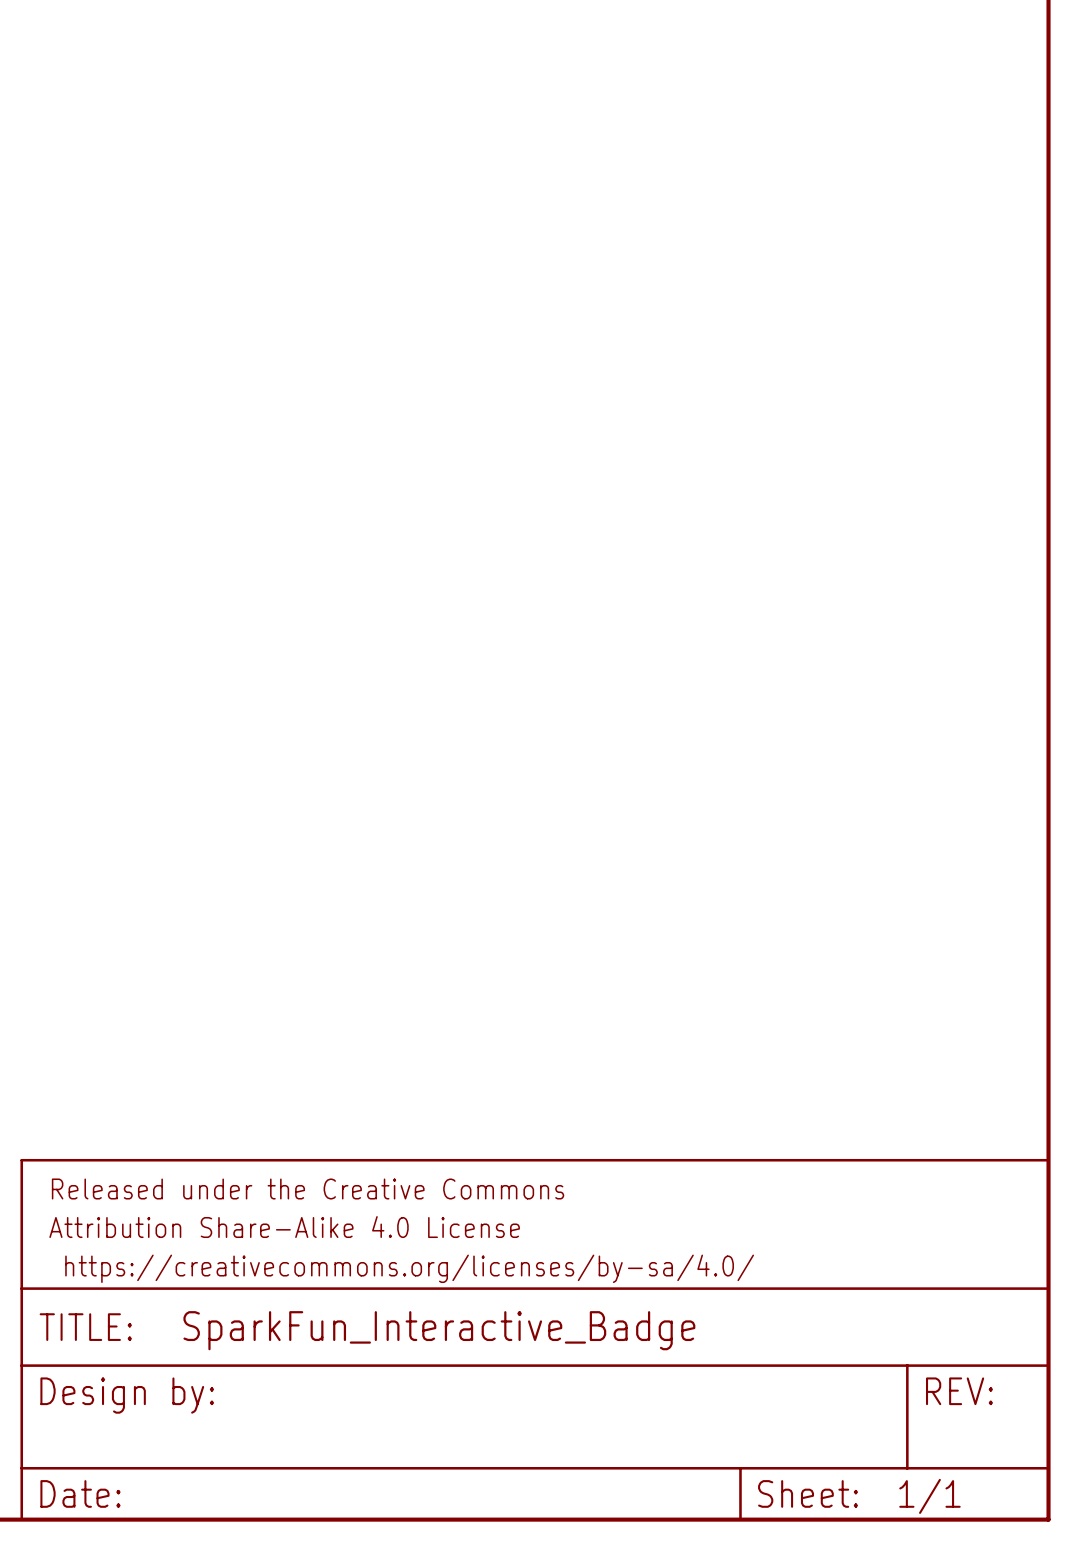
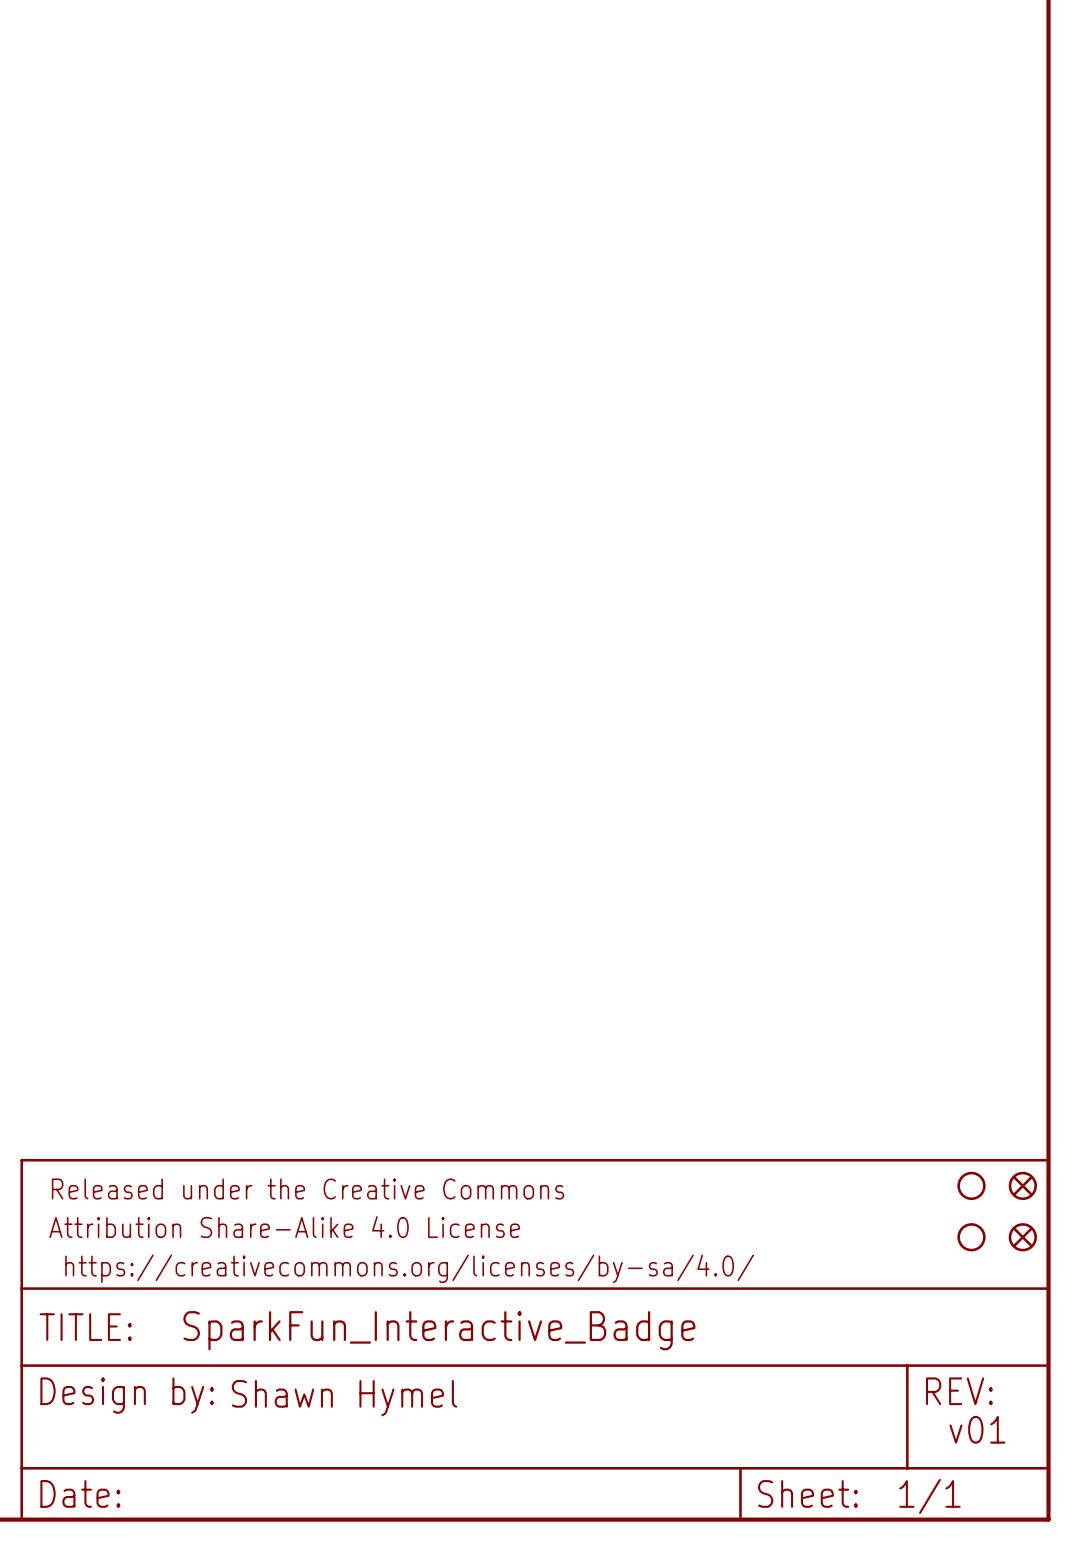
part: none -> (971, 1185)
part: none -> (1022, 1185)
part: none -> (971, 1237)
part: none -> (1022, 1237)
text: none -> Shawn Hymel (344, 1398)
text: none -> v01 (977, 1429)

